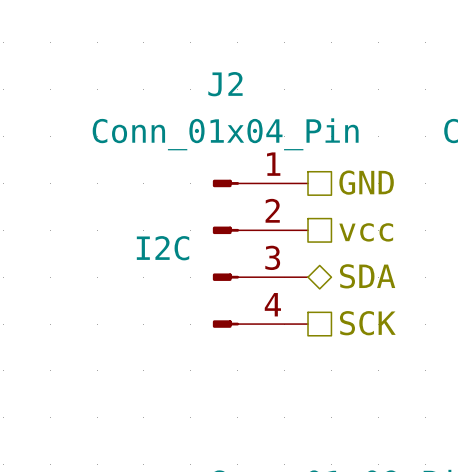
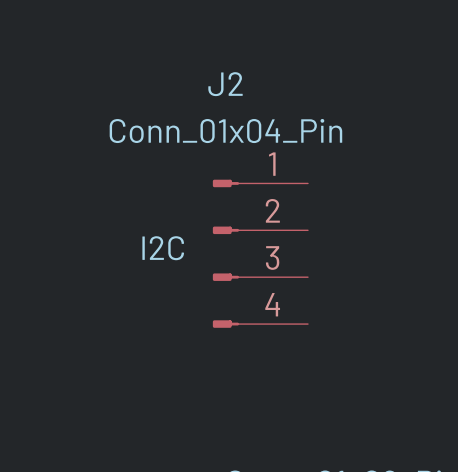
hierarchical label: GND (366, 182) -> none
hierarchical label: vcc (366, 232) -> none
hierarchical label: SDA (367, 276) -> none
hierarchical label: SCK (367, 323) -> none

